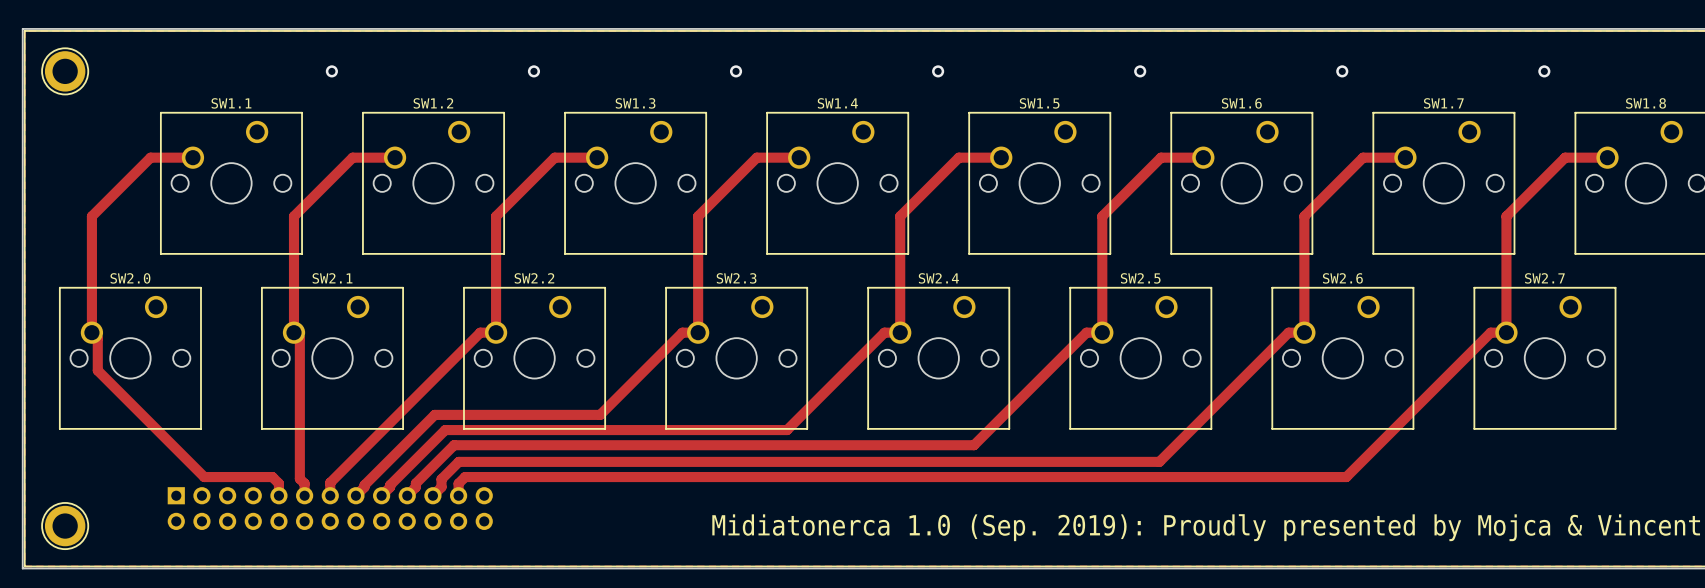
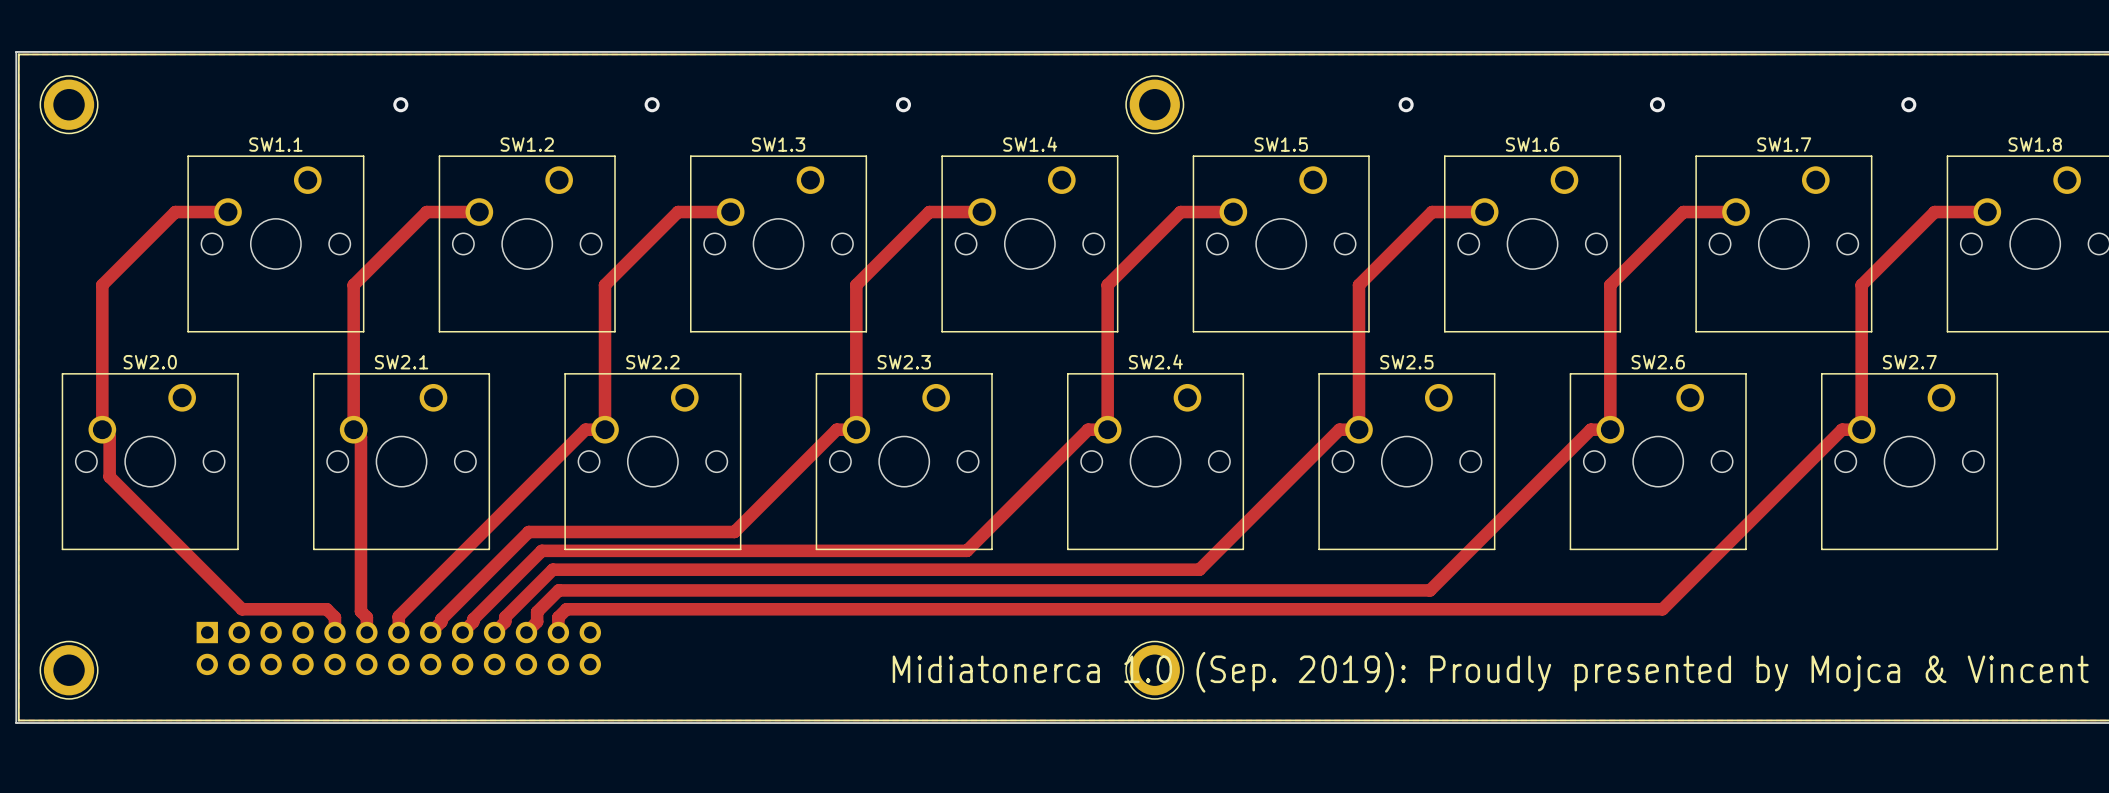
via: (938, 71) -> none
part: none -> (1154, 104)
part: none -> (1154, 670)

